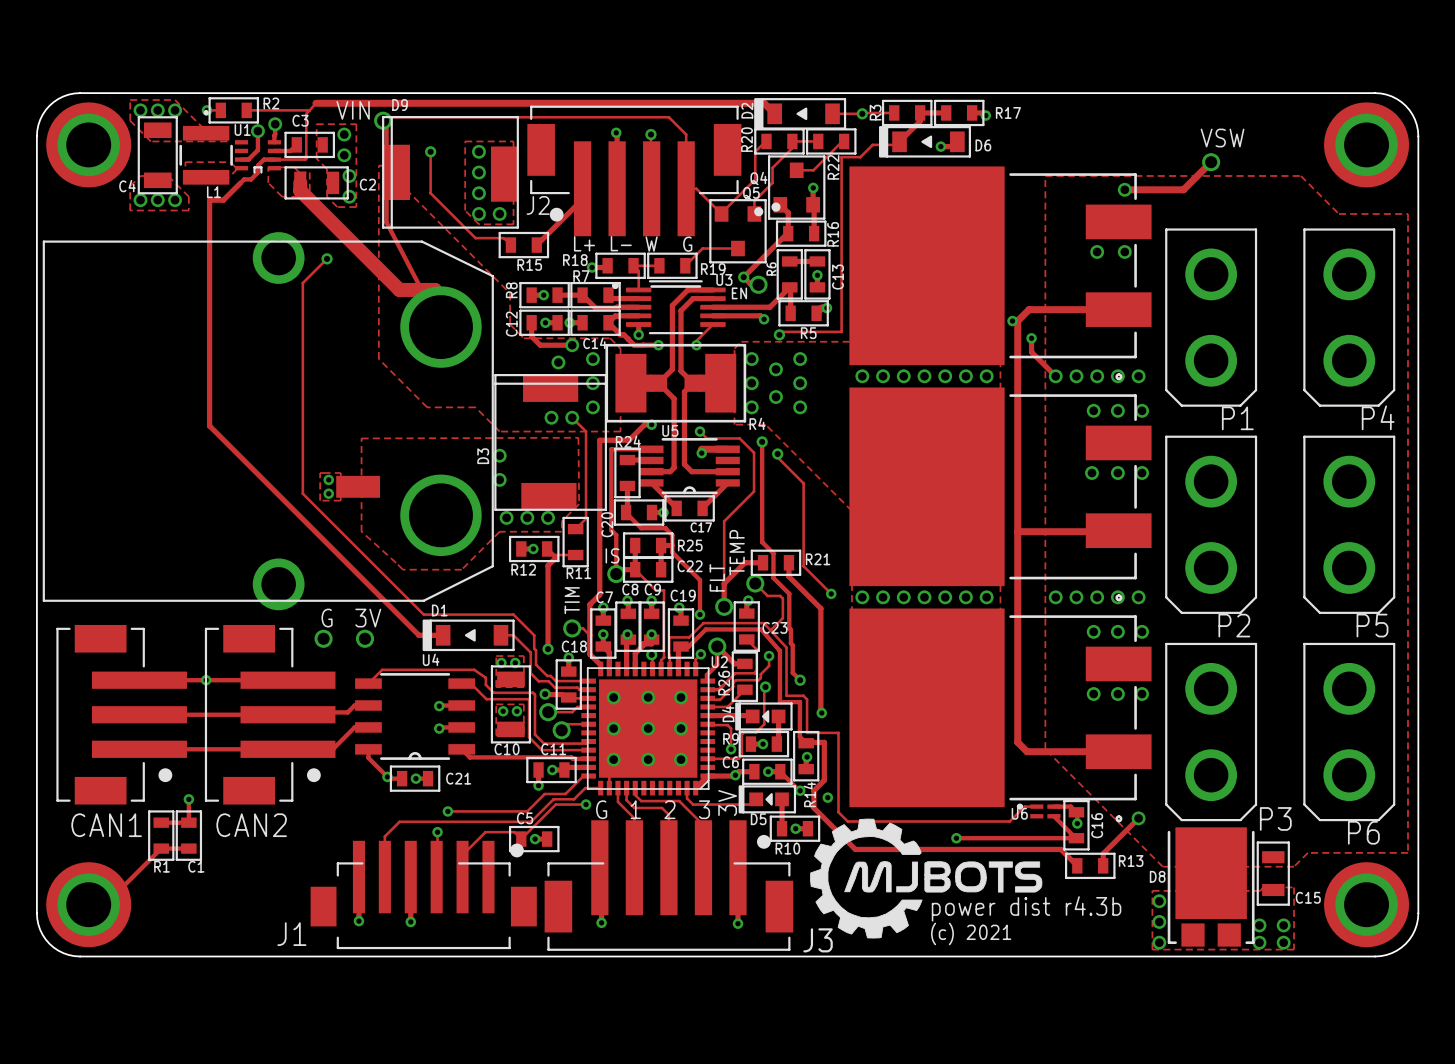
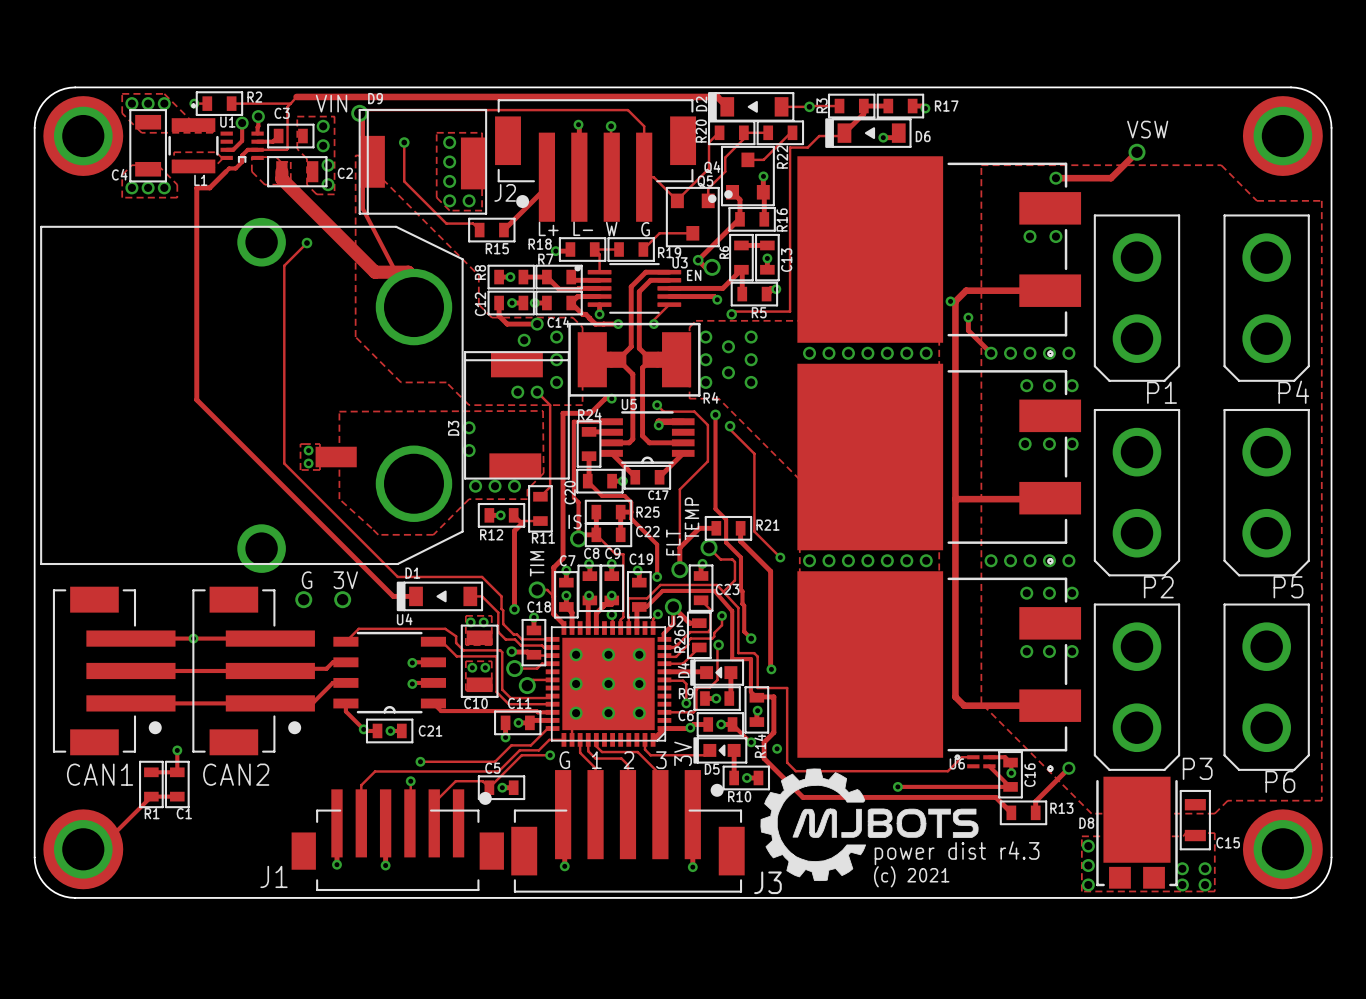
line: (651, 286) (700, 286) -> none
text: power dist r4.3b (1026, 908) -> power dist r4.3 (957, 853)

